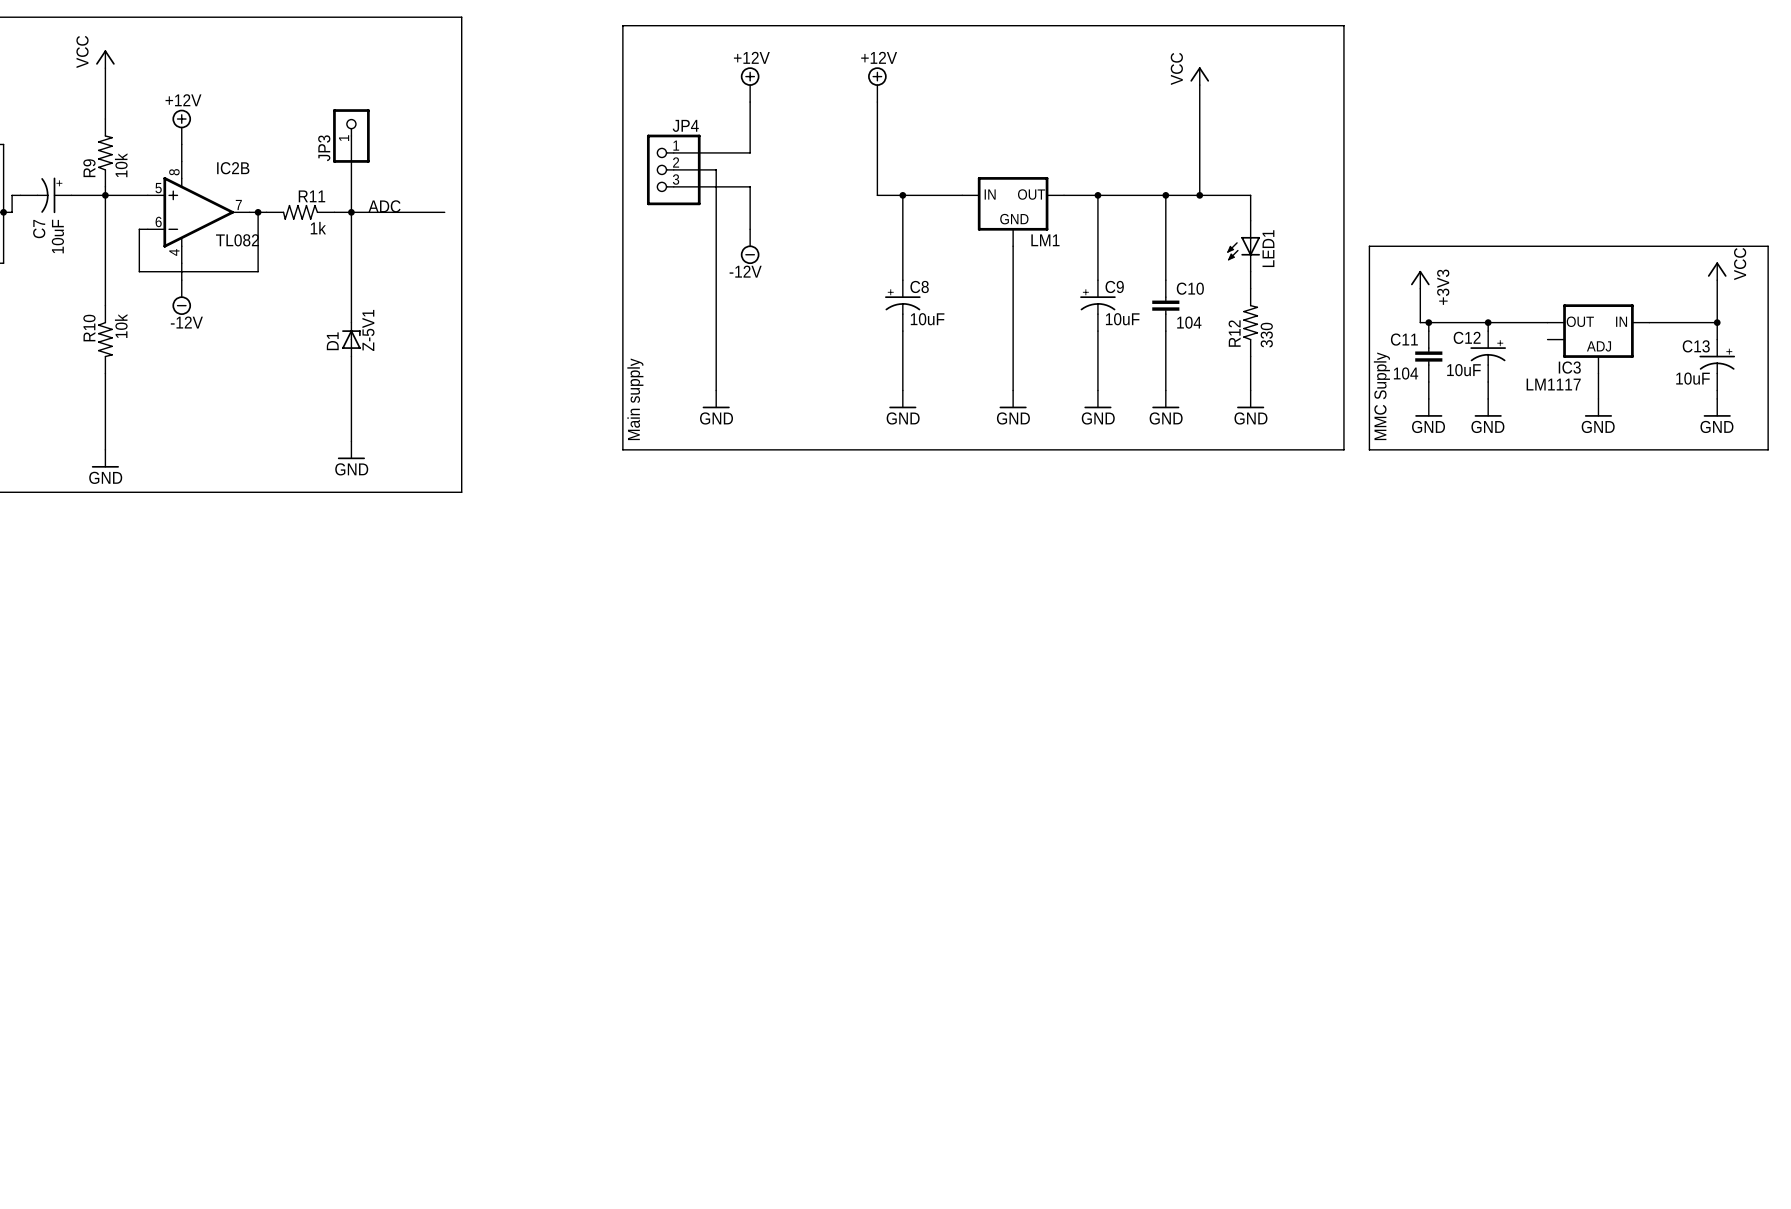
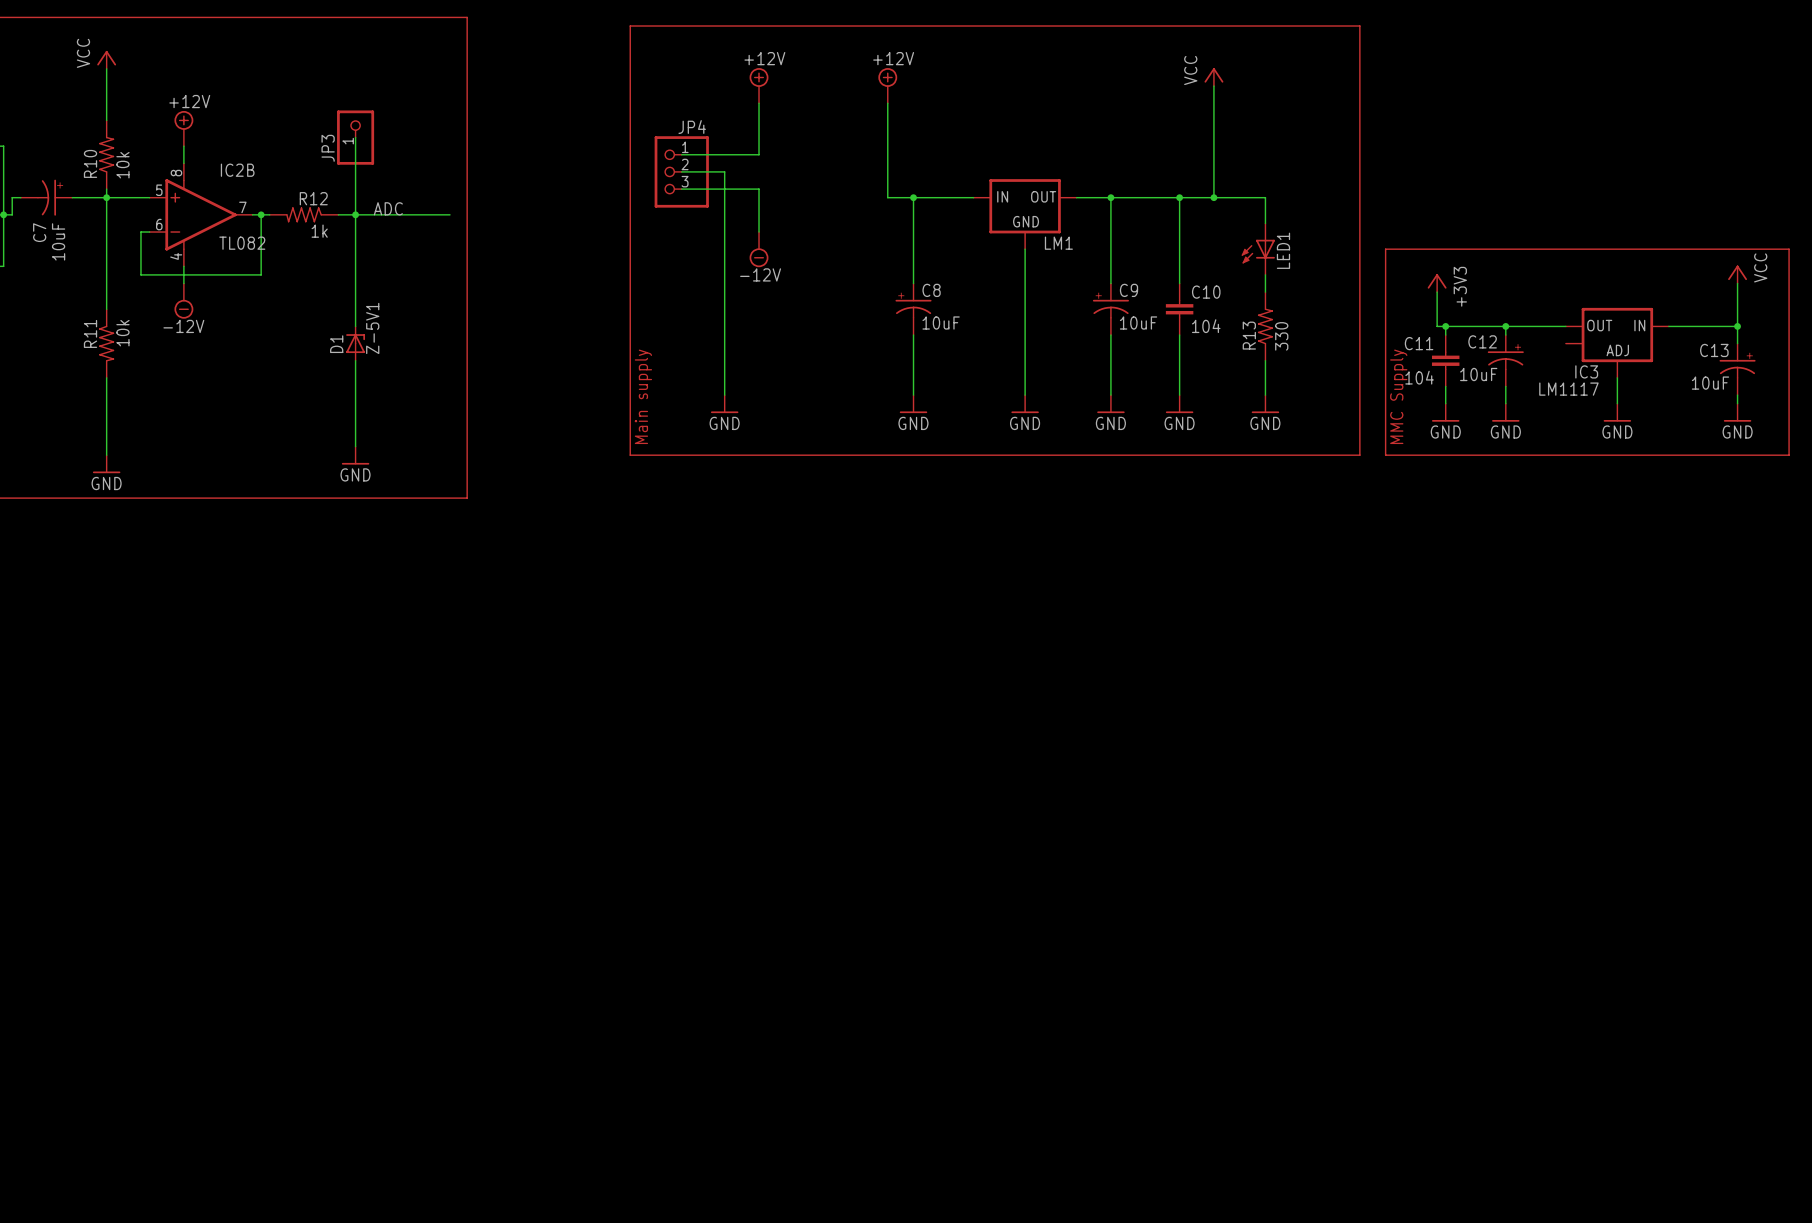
R9 name: R9 (89, 168) -> R10 (90, 163)
R11 name: R11 (311, 196) -> R12 (313, 198)
R10 name: R10 (89, 328) -> R11 (90, 333)
R12 name: R12 (1234, 333) -> R13 (1249, 335)

